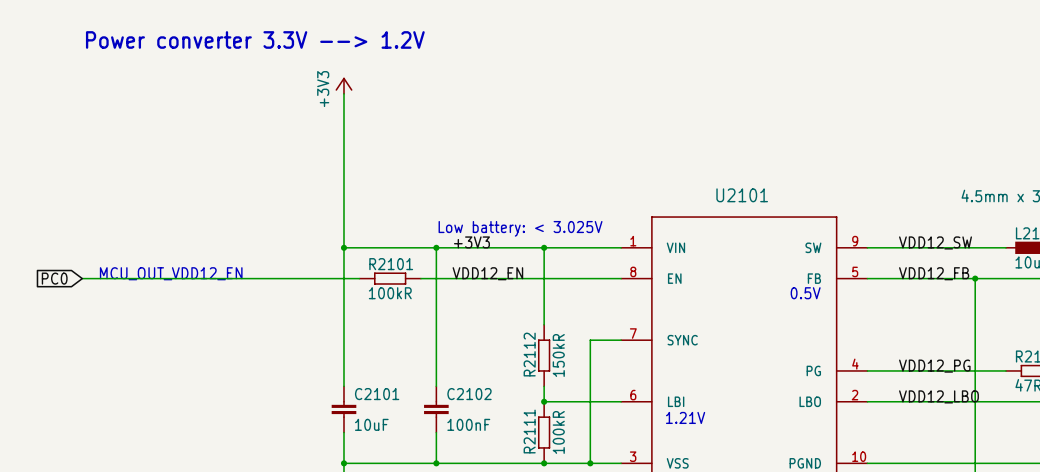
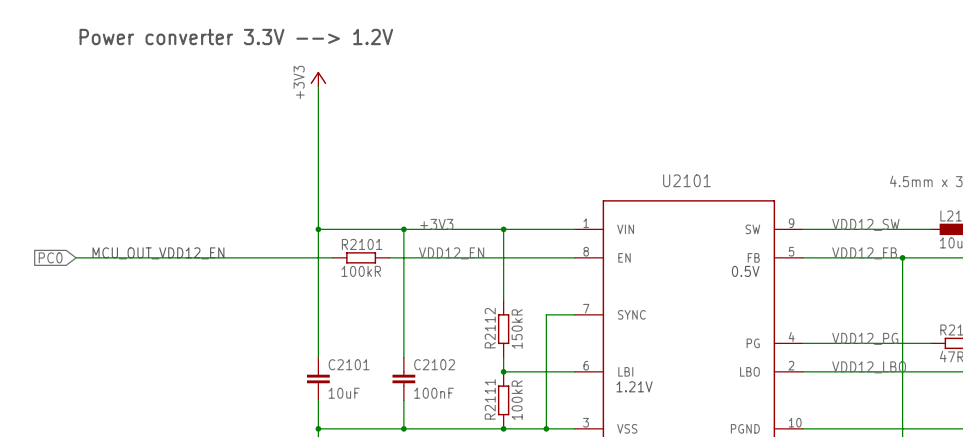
text: Low battery: < 3.025V (520, 228) -> none

